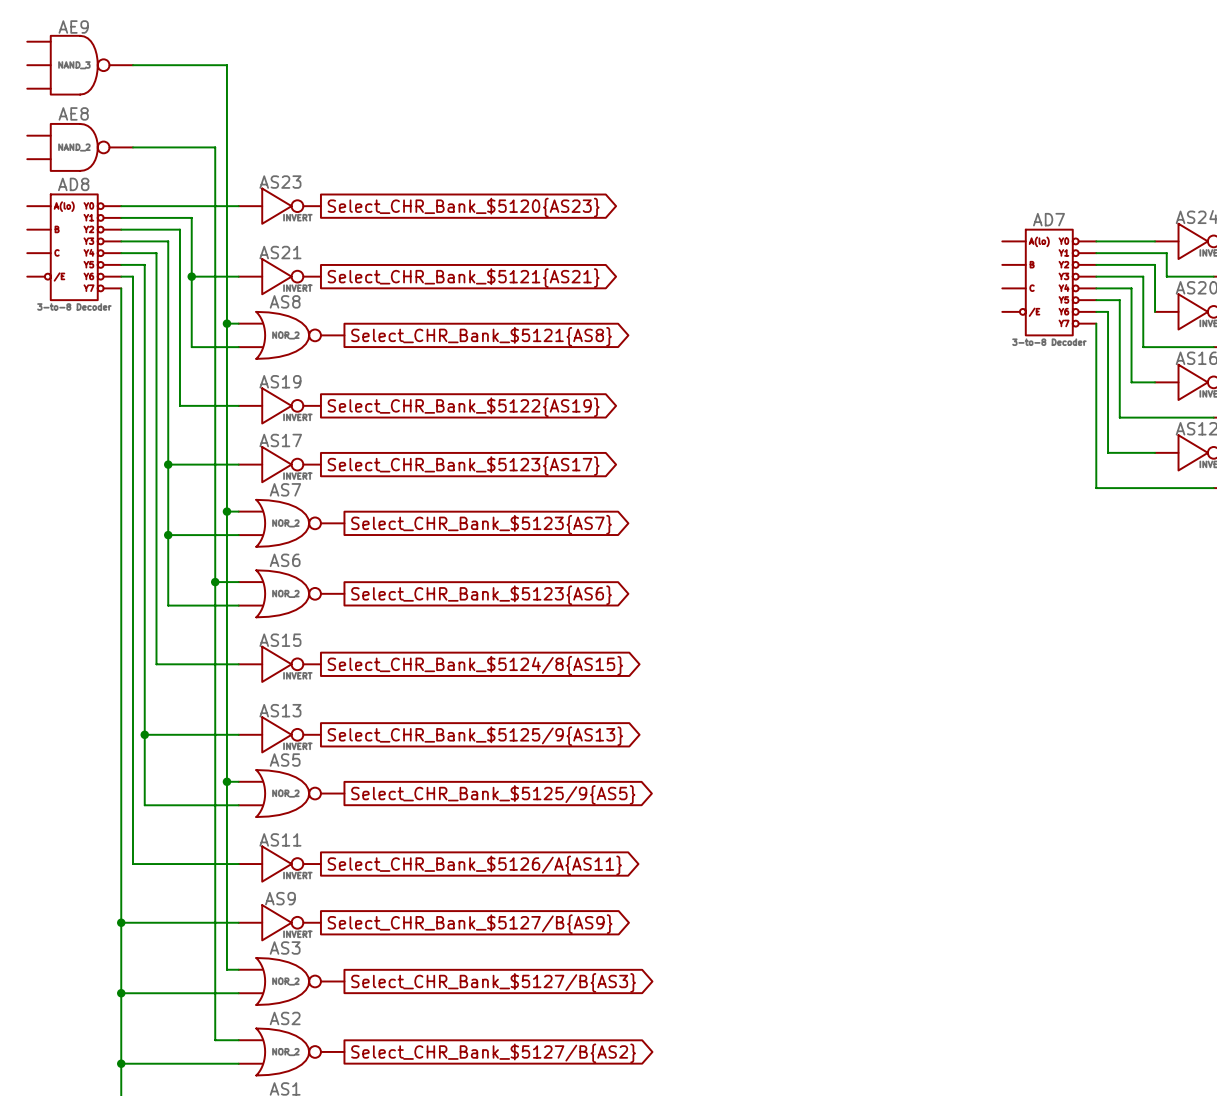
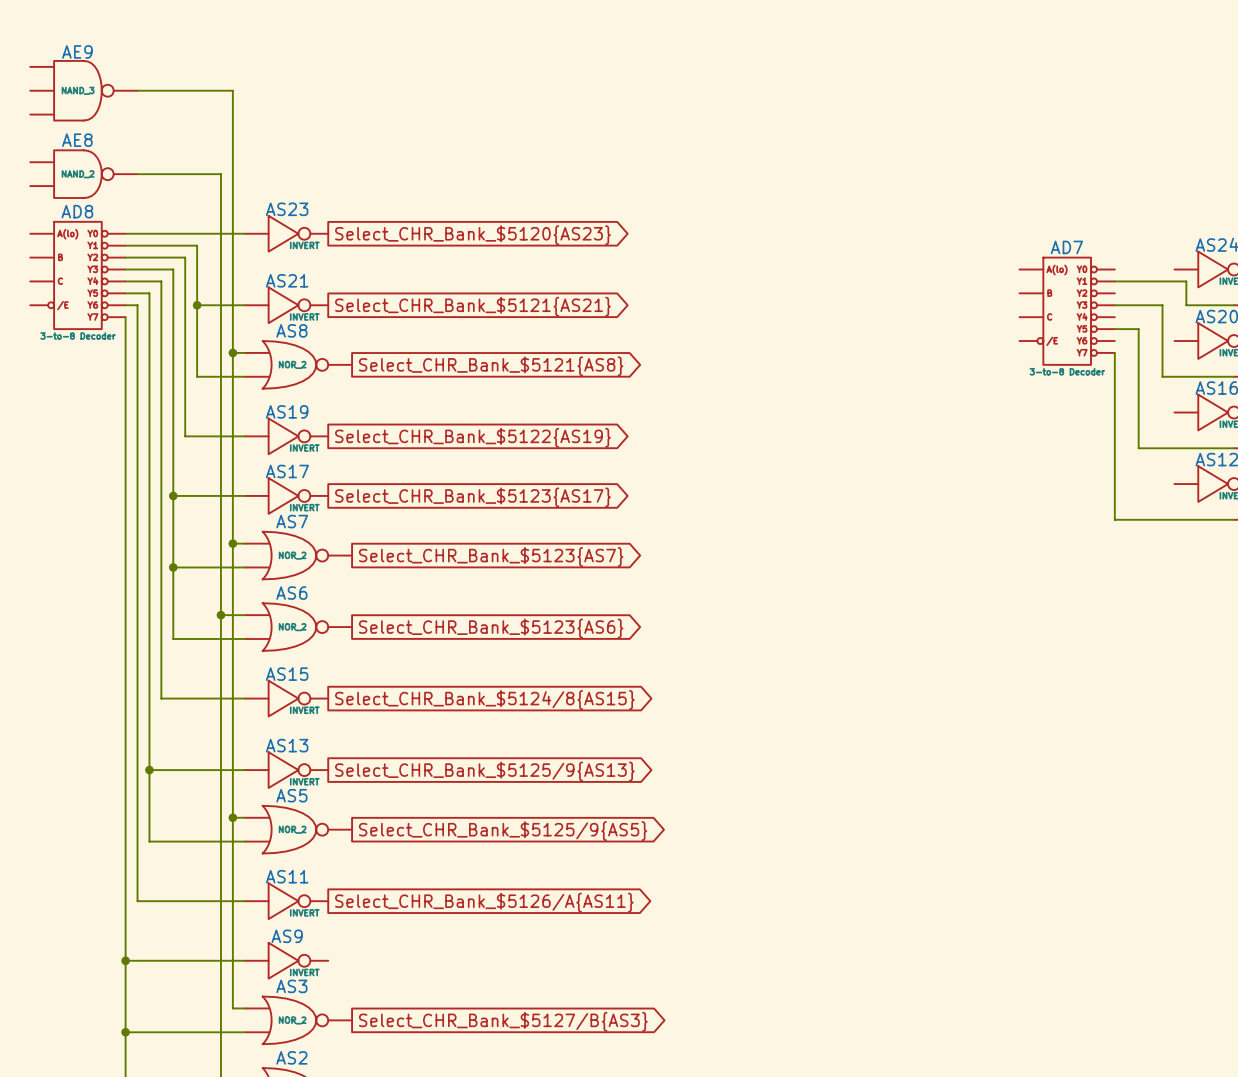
wire: (1096, 241) (1155, 241) -> none
wire: (1096, 264) (1155, 264) (1155, 311) -> none
wire: (1096, 288) (1131, 288) (1131, 382) (1155, 382) -> none
wire: (1096, 311) (1108, 311) (1108, 452) (1155, 452) -> none
global label: Select_CHR_Bank_$5127/B{AS9} (470, 924) -> none

